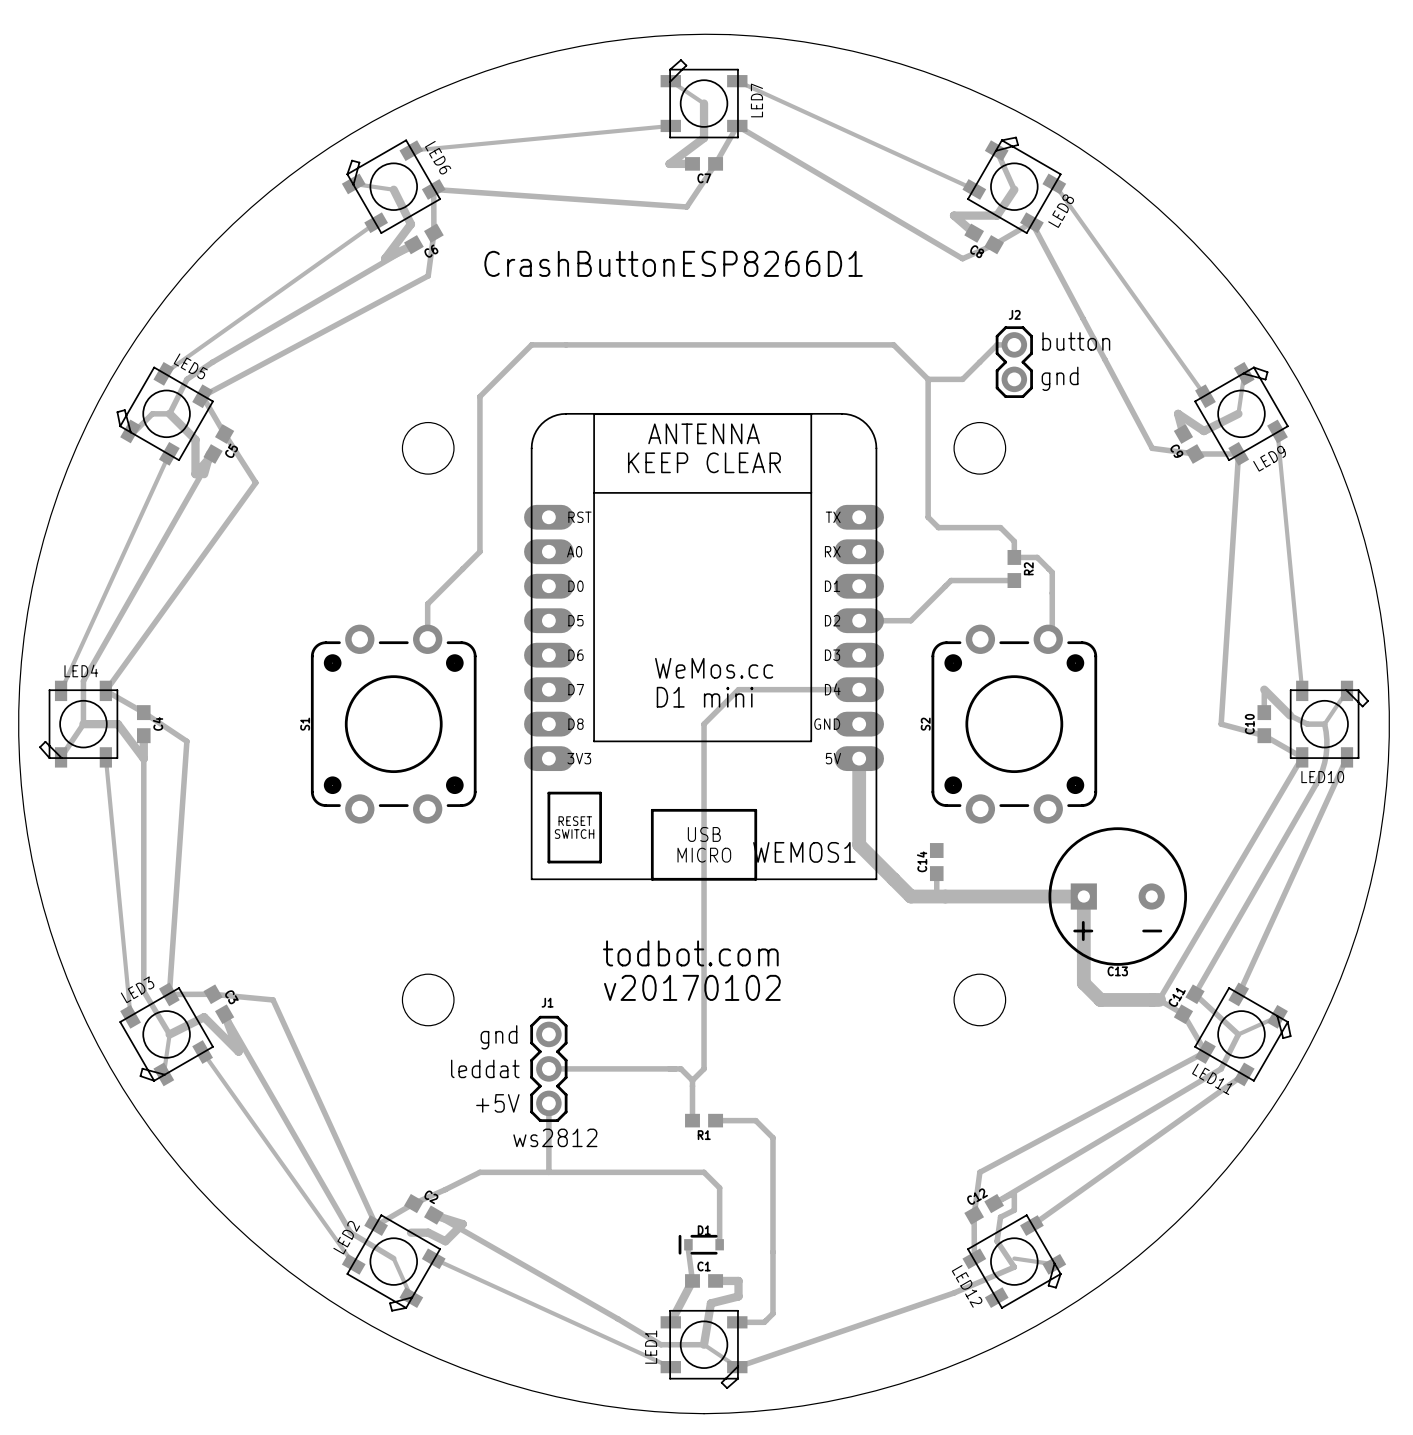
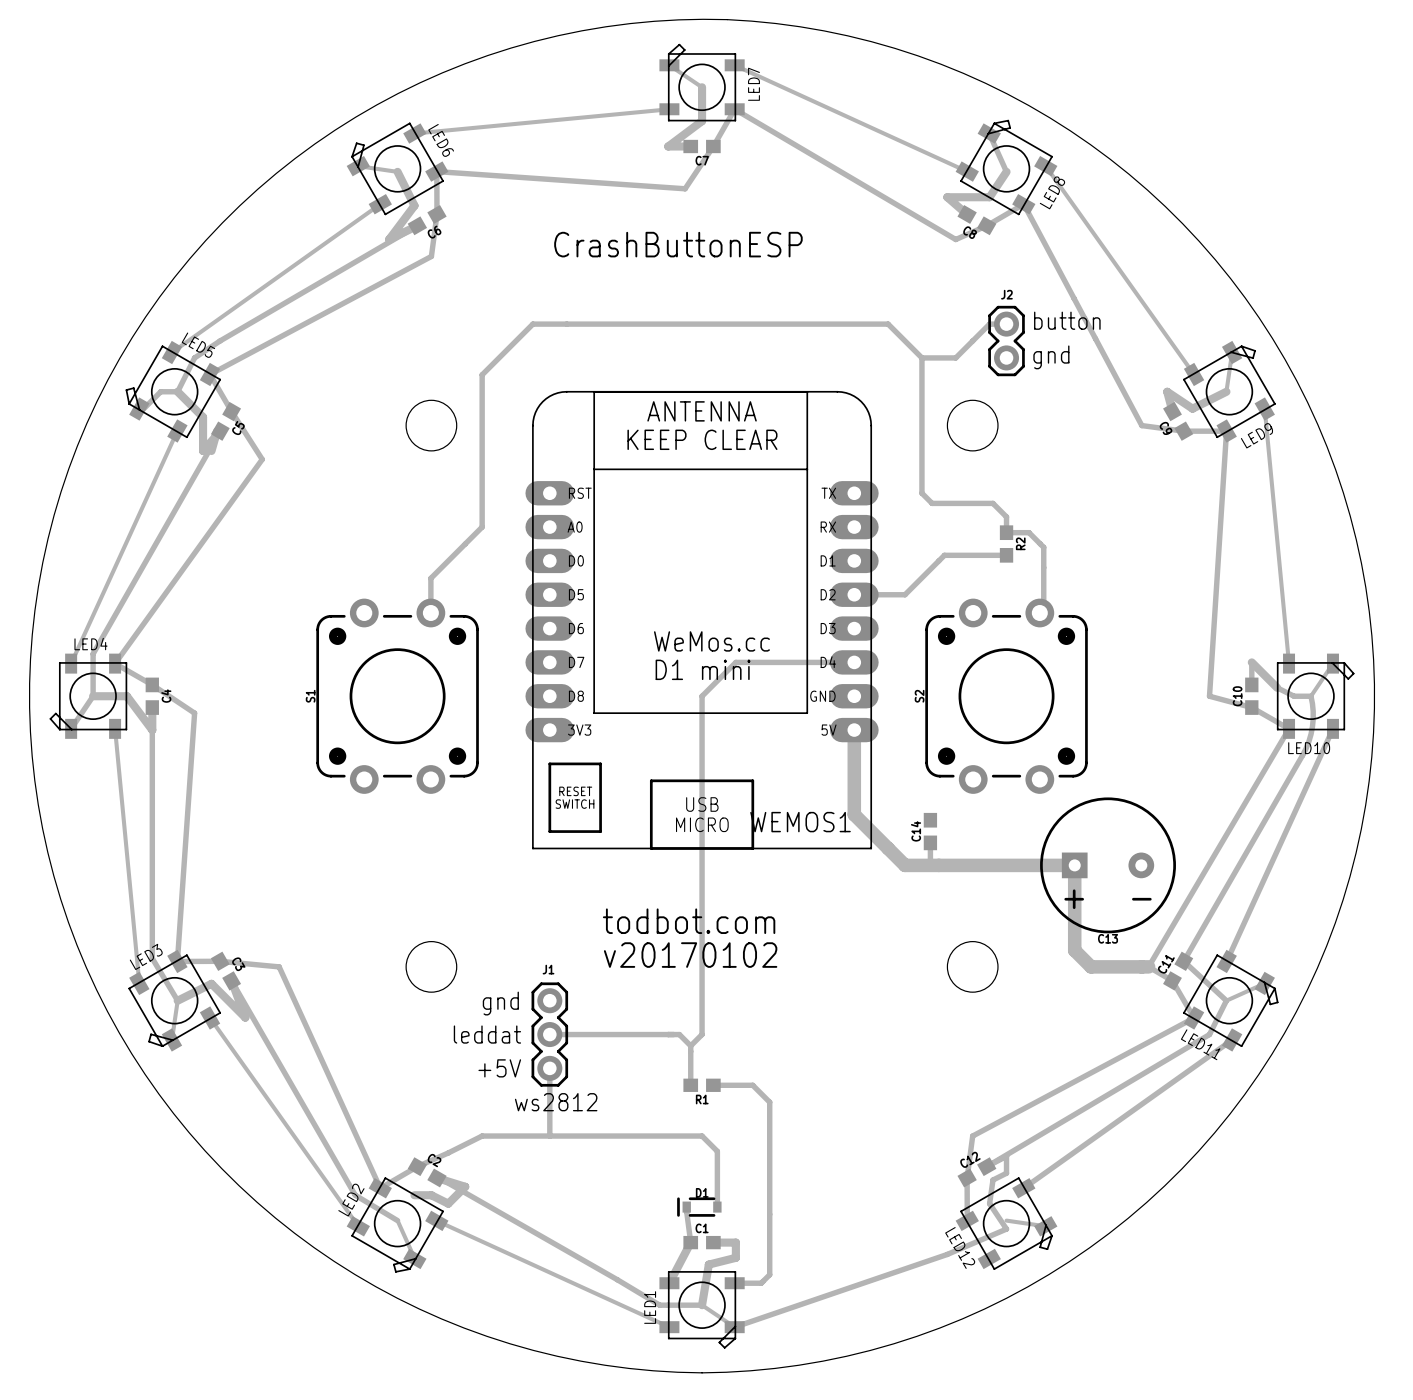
text: CrashButtonESP8266D1 (673, 263) -> CrashButtonESP (678, 244)

